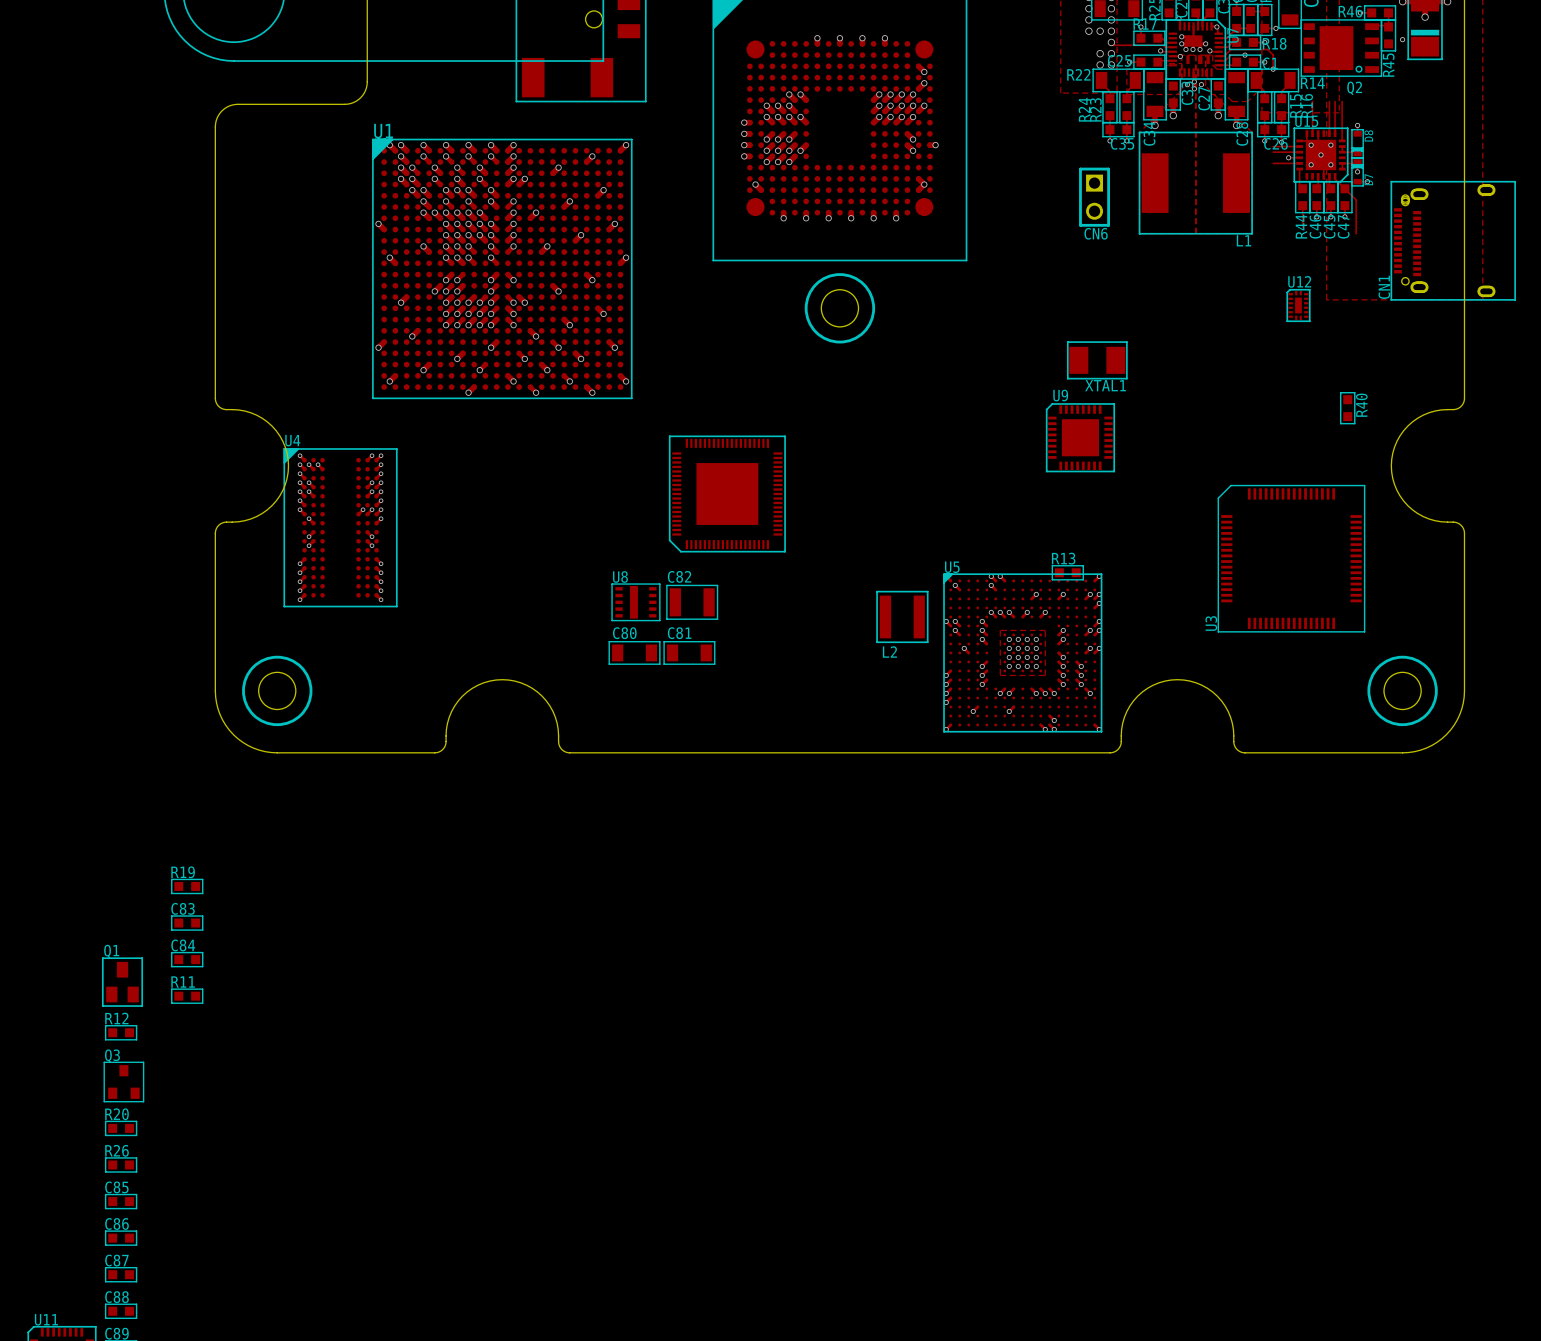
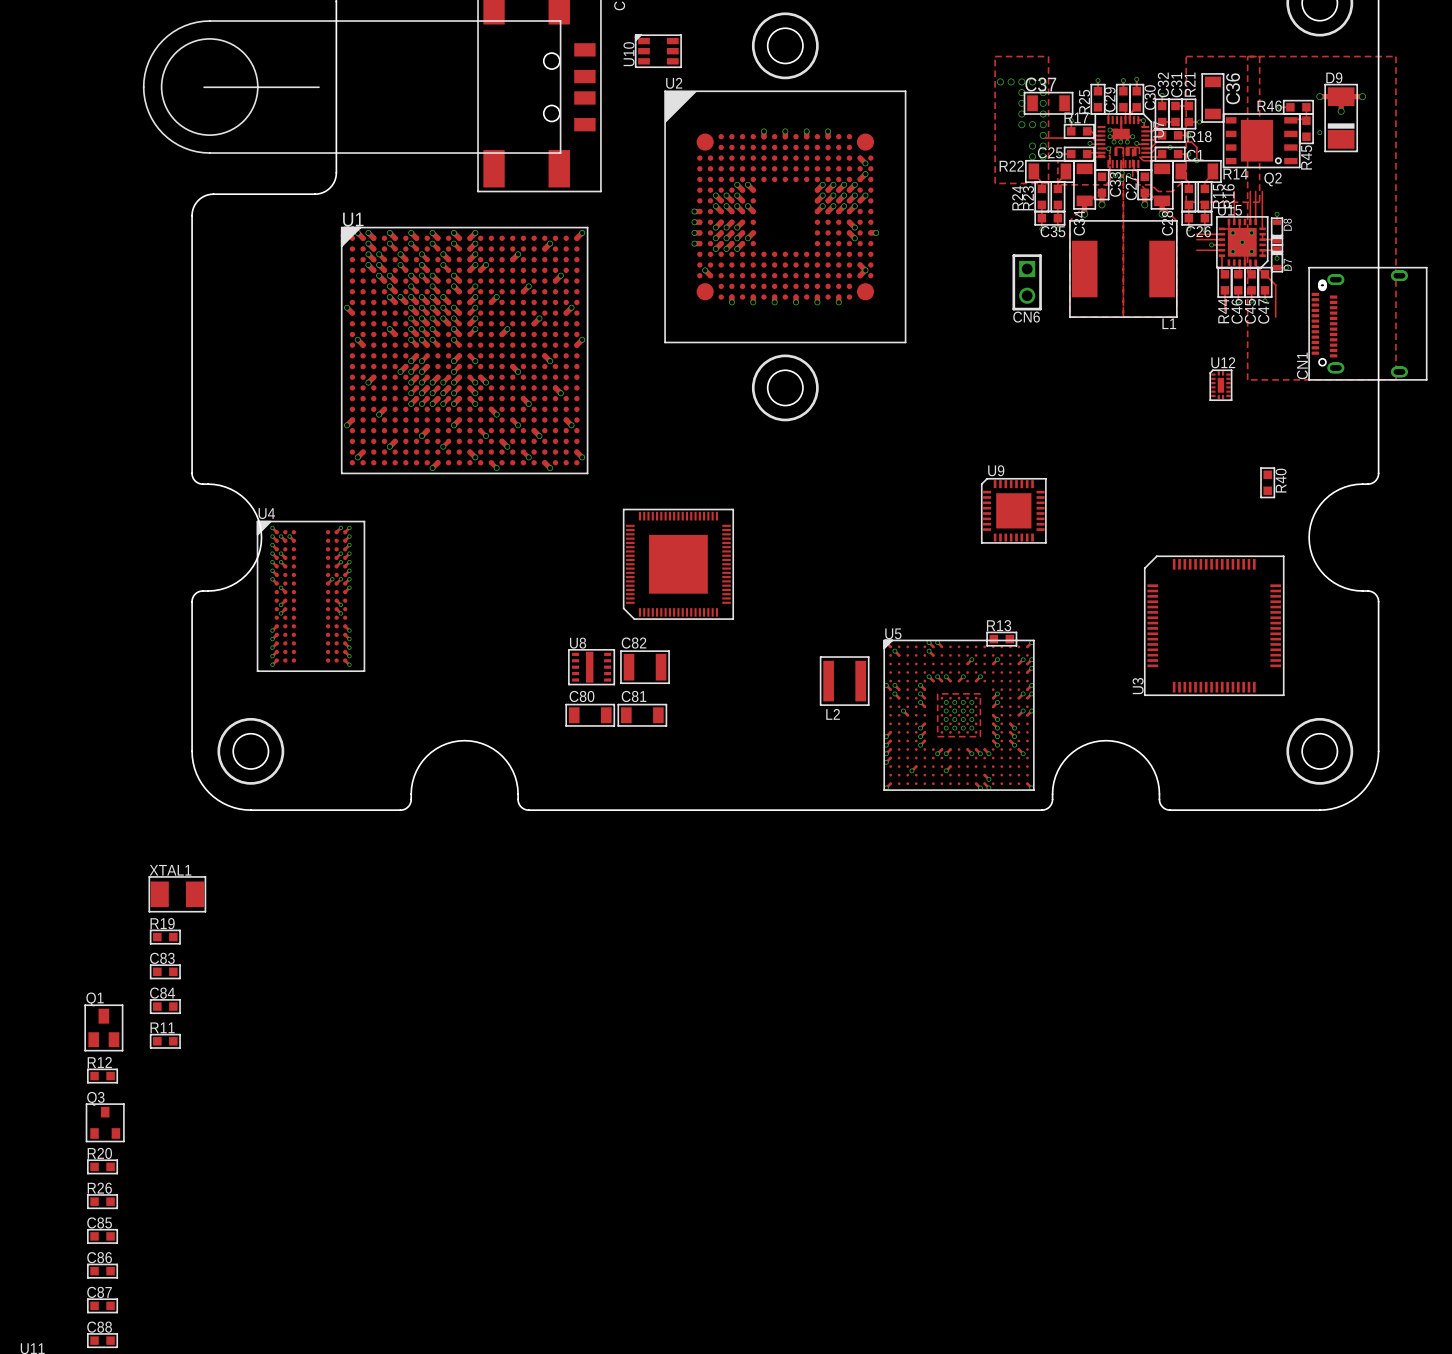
XTAL1 position: (1097, 360) -> (177, 894)
XTAL1 name position: XTAL1 (1105, 385) -> XTAL1 (170, 870)

